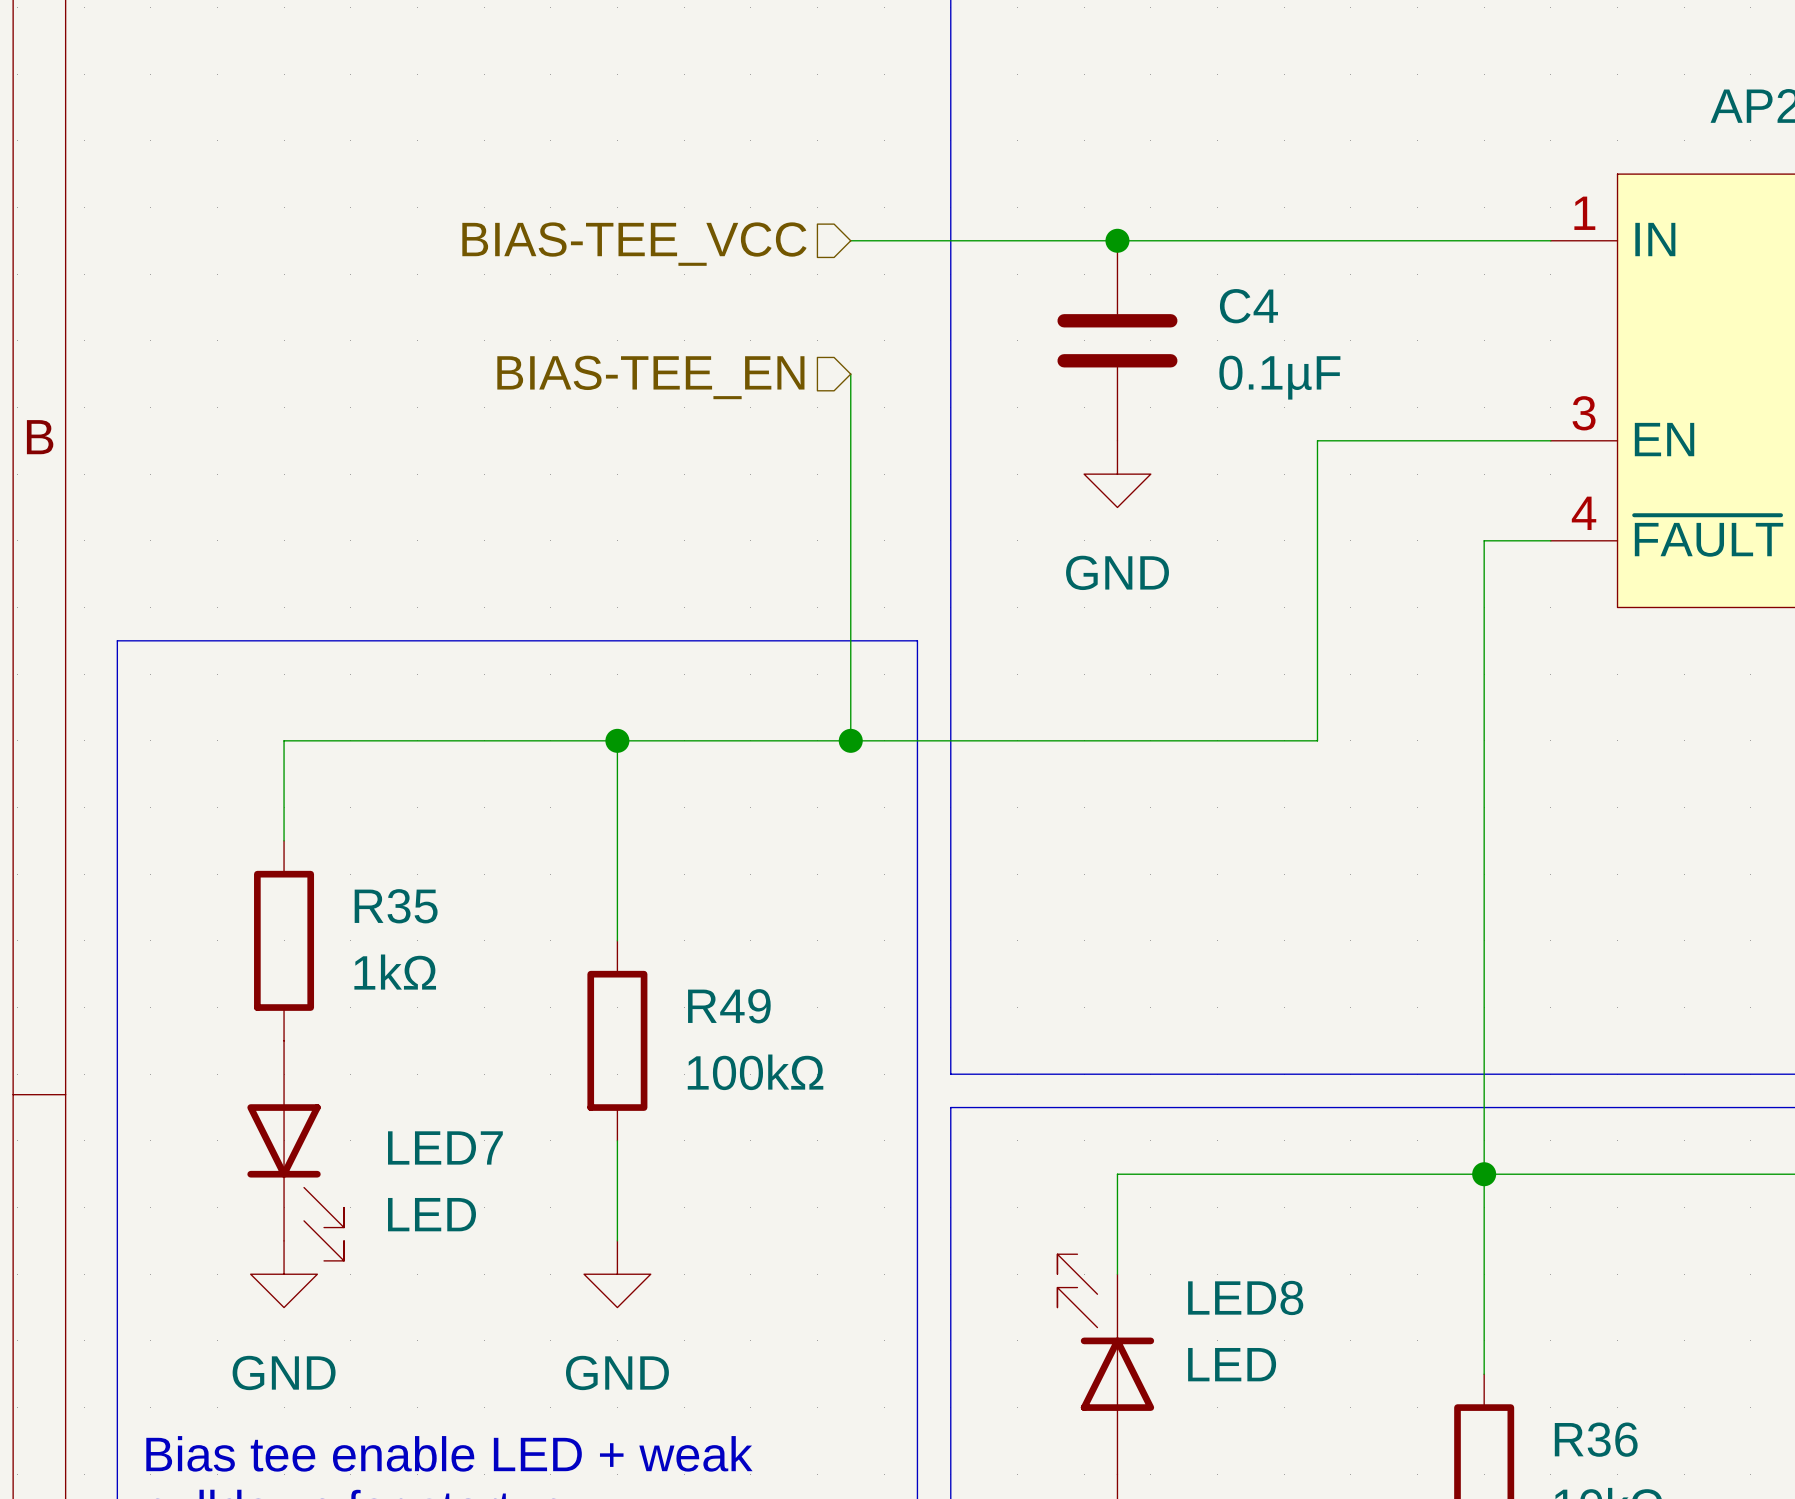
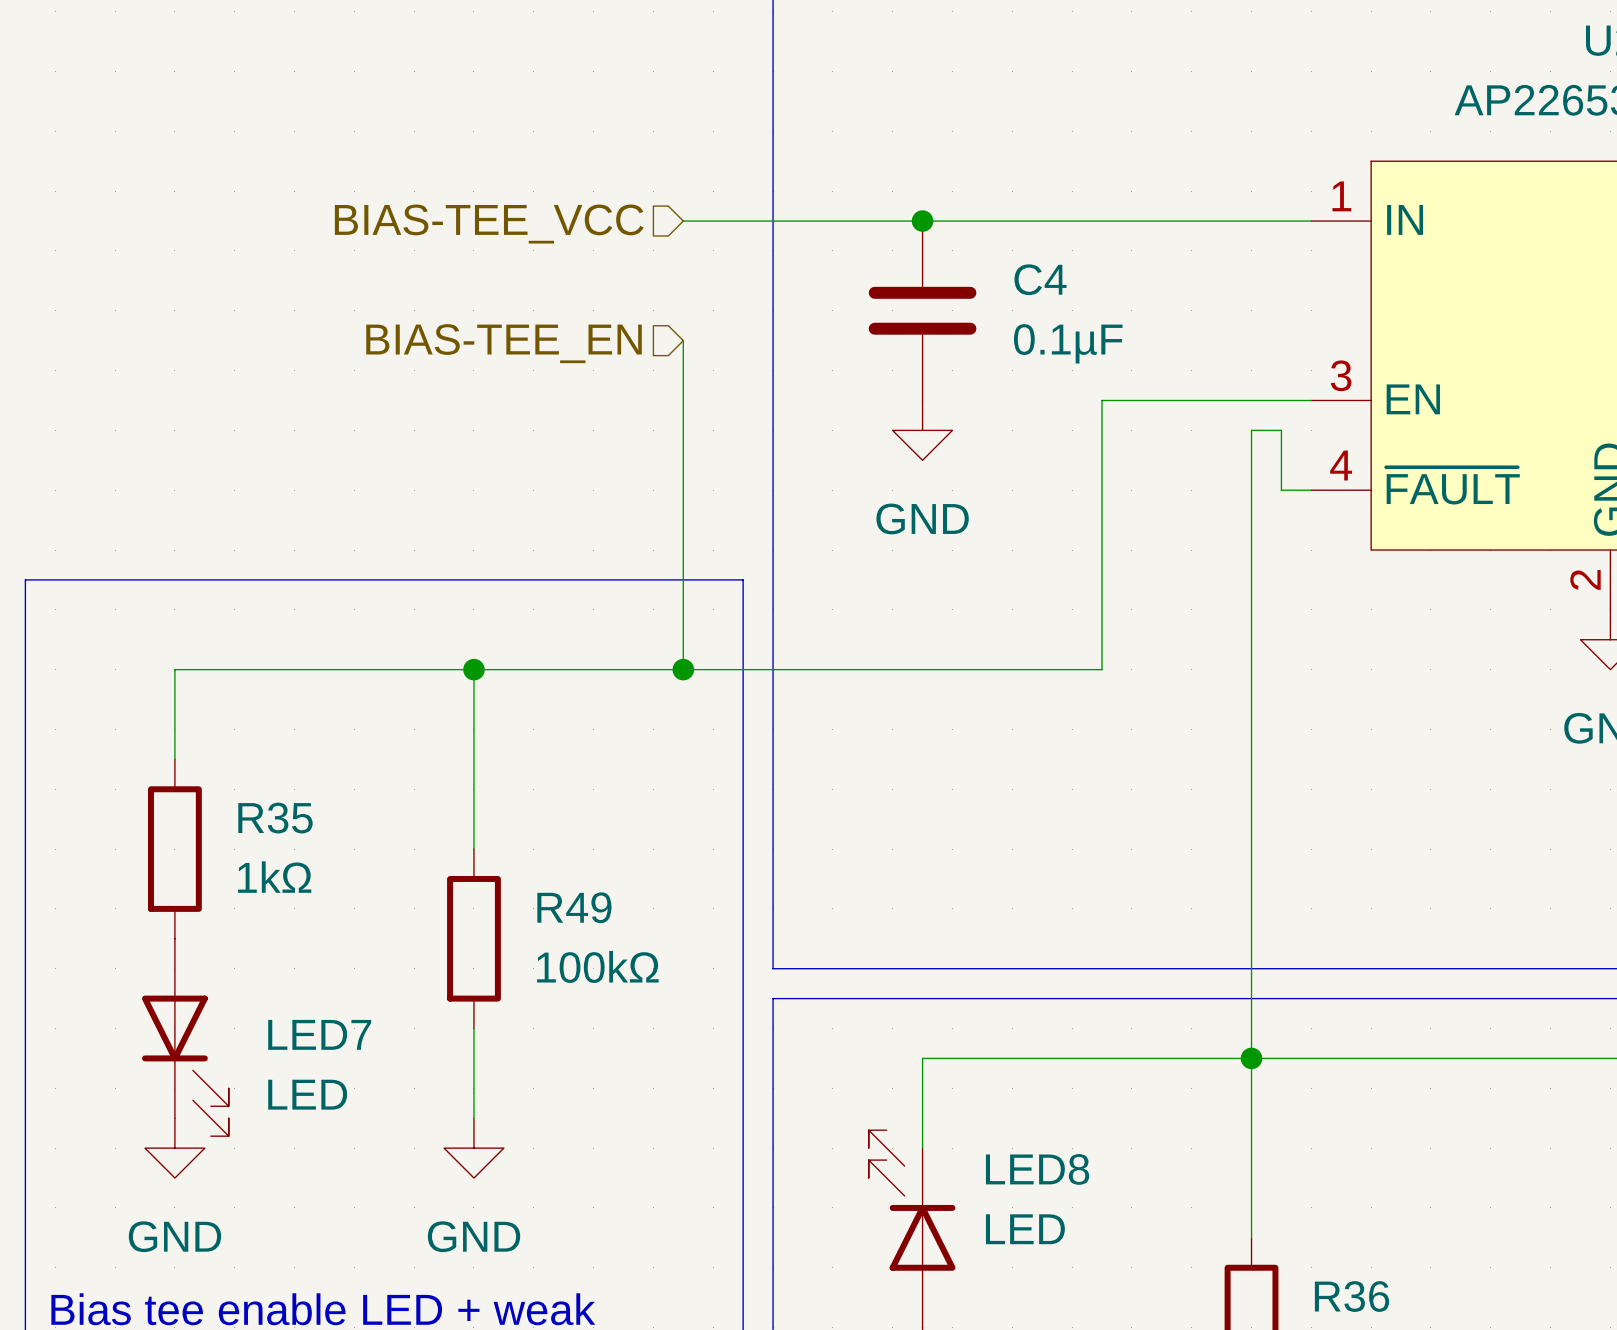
wire: (1484, 540) (1517, 540) -> (1251, 490) (1251, 430) (1281, 430) (1281, 490)

